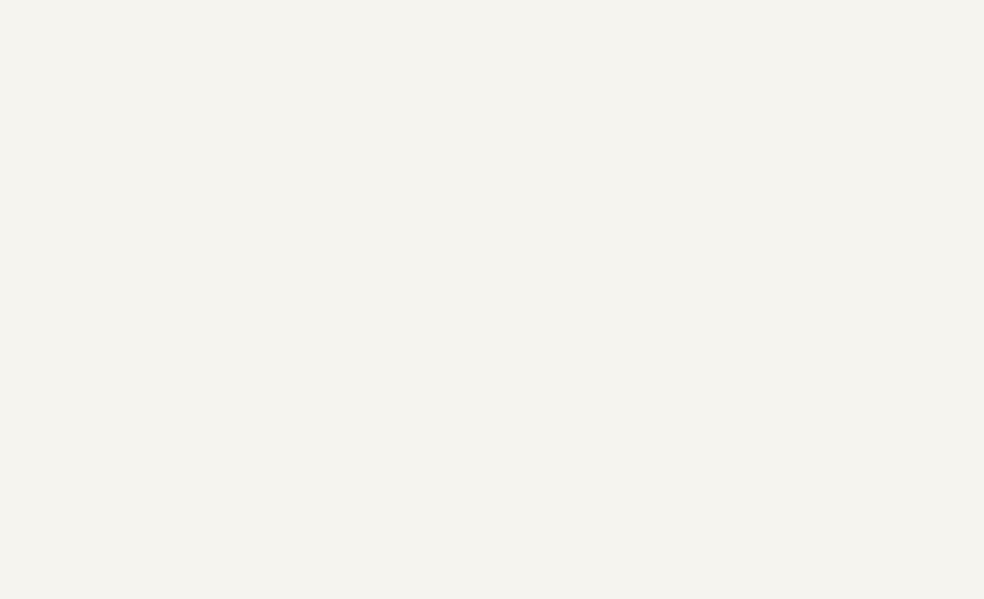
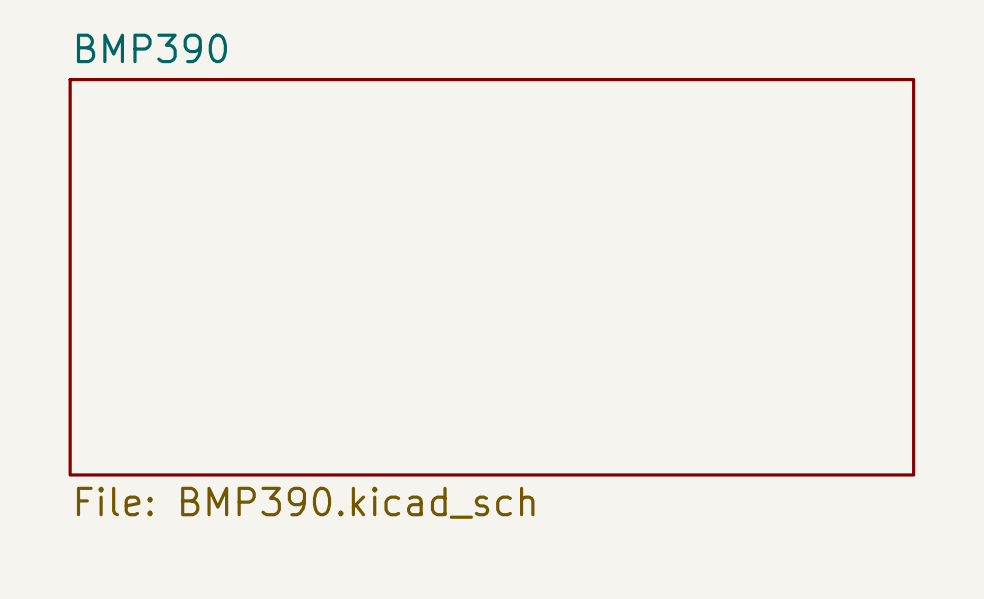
sheet BMP390: none -> File: BMP390.kicad_sch (491, 277)

